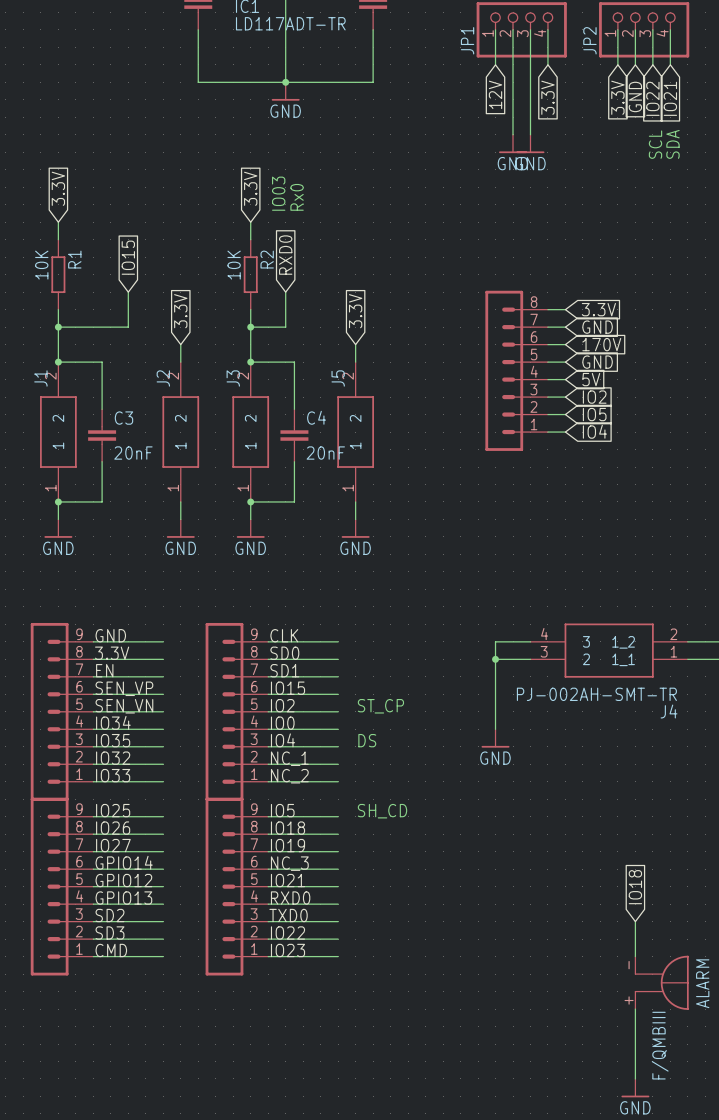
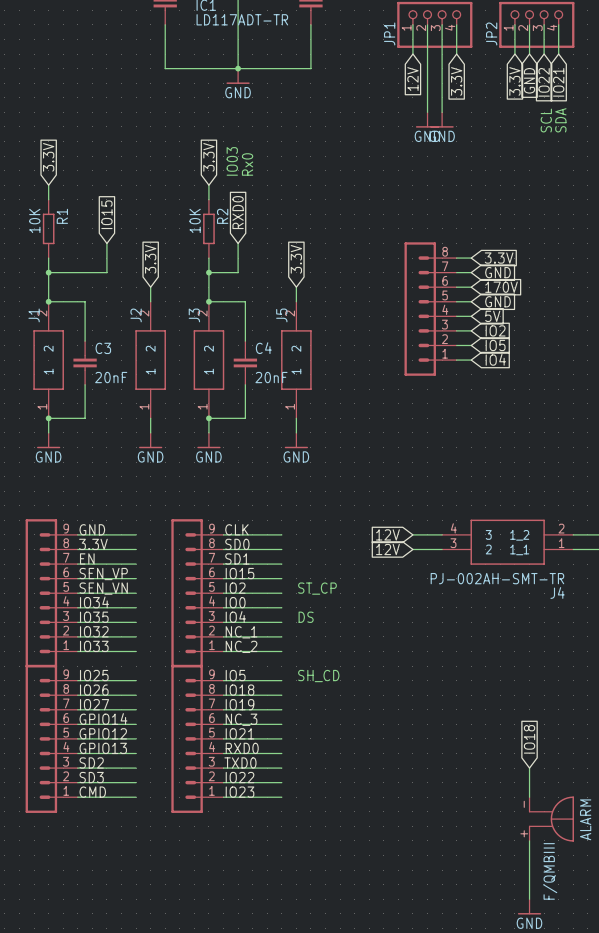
global label: none -> 12V (387, 534)
wire: (495, 641) (495, 729) -> none
global label: none -> 12V (387, 549)
junction: (495, 659) -> none
power symbol: GND (495, 738) -> none

